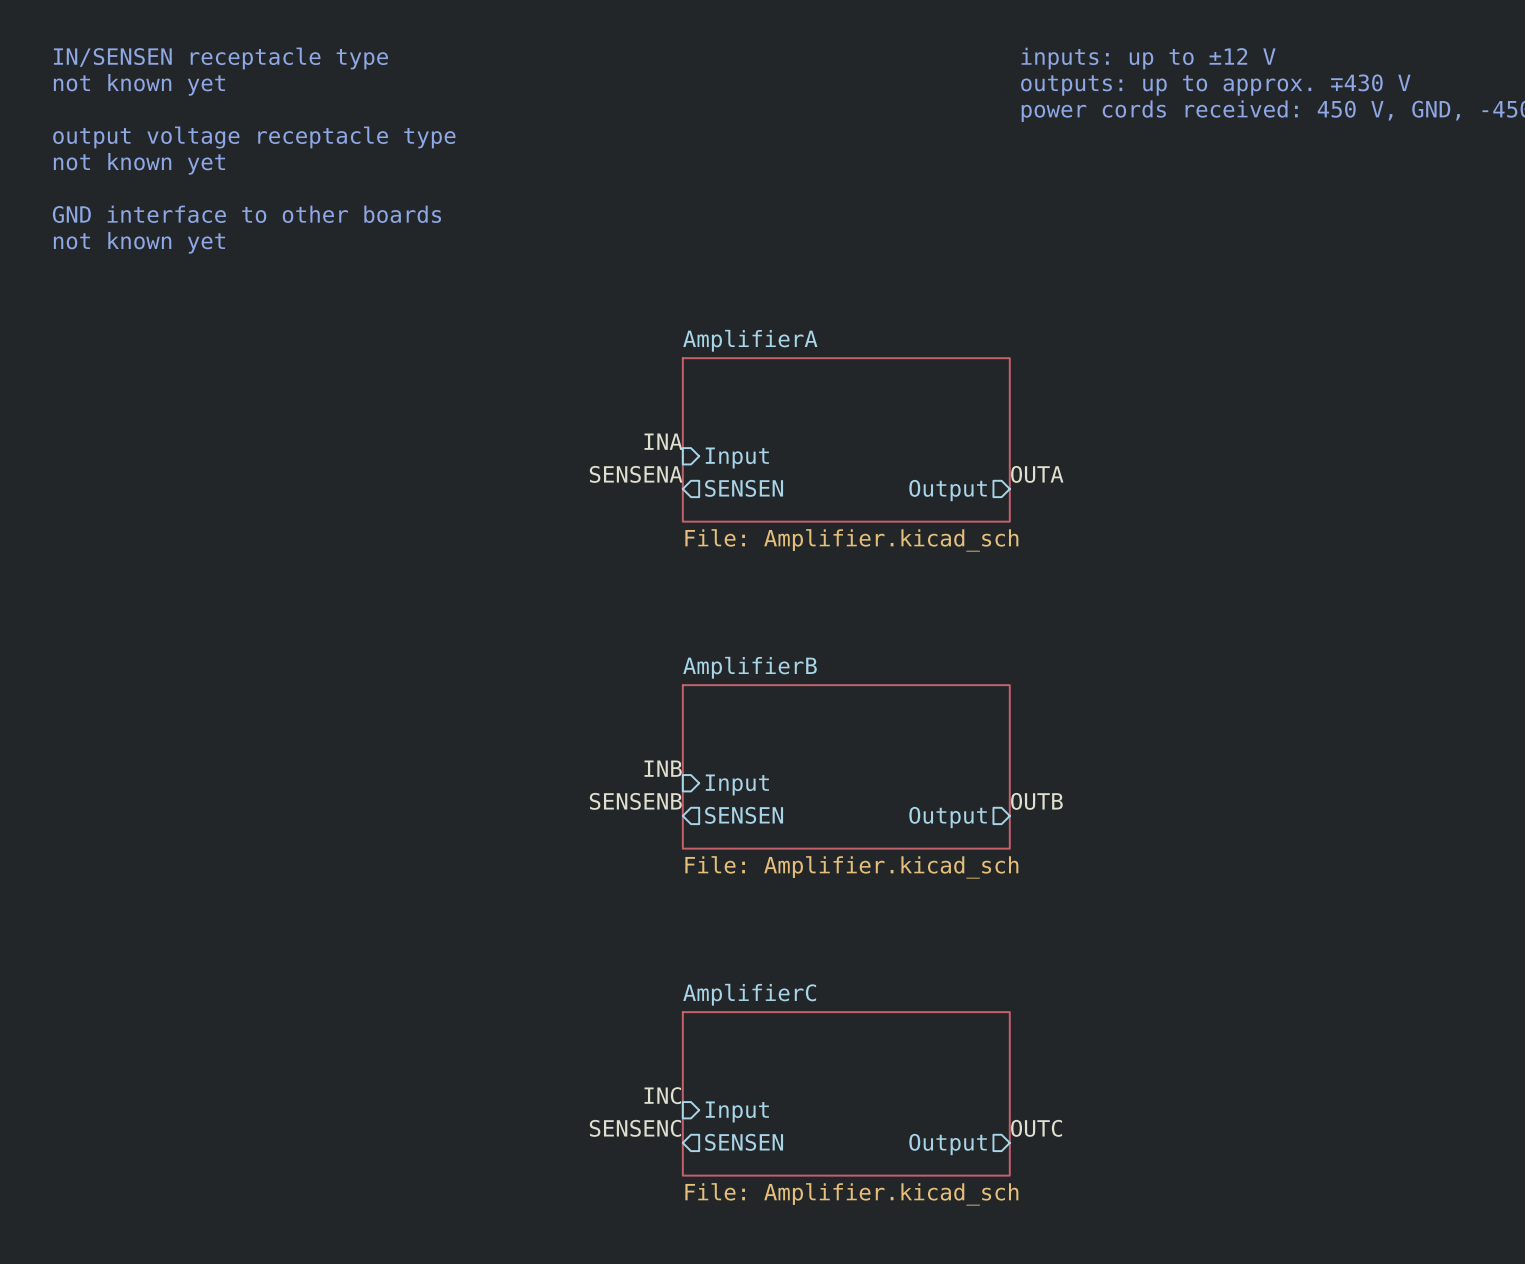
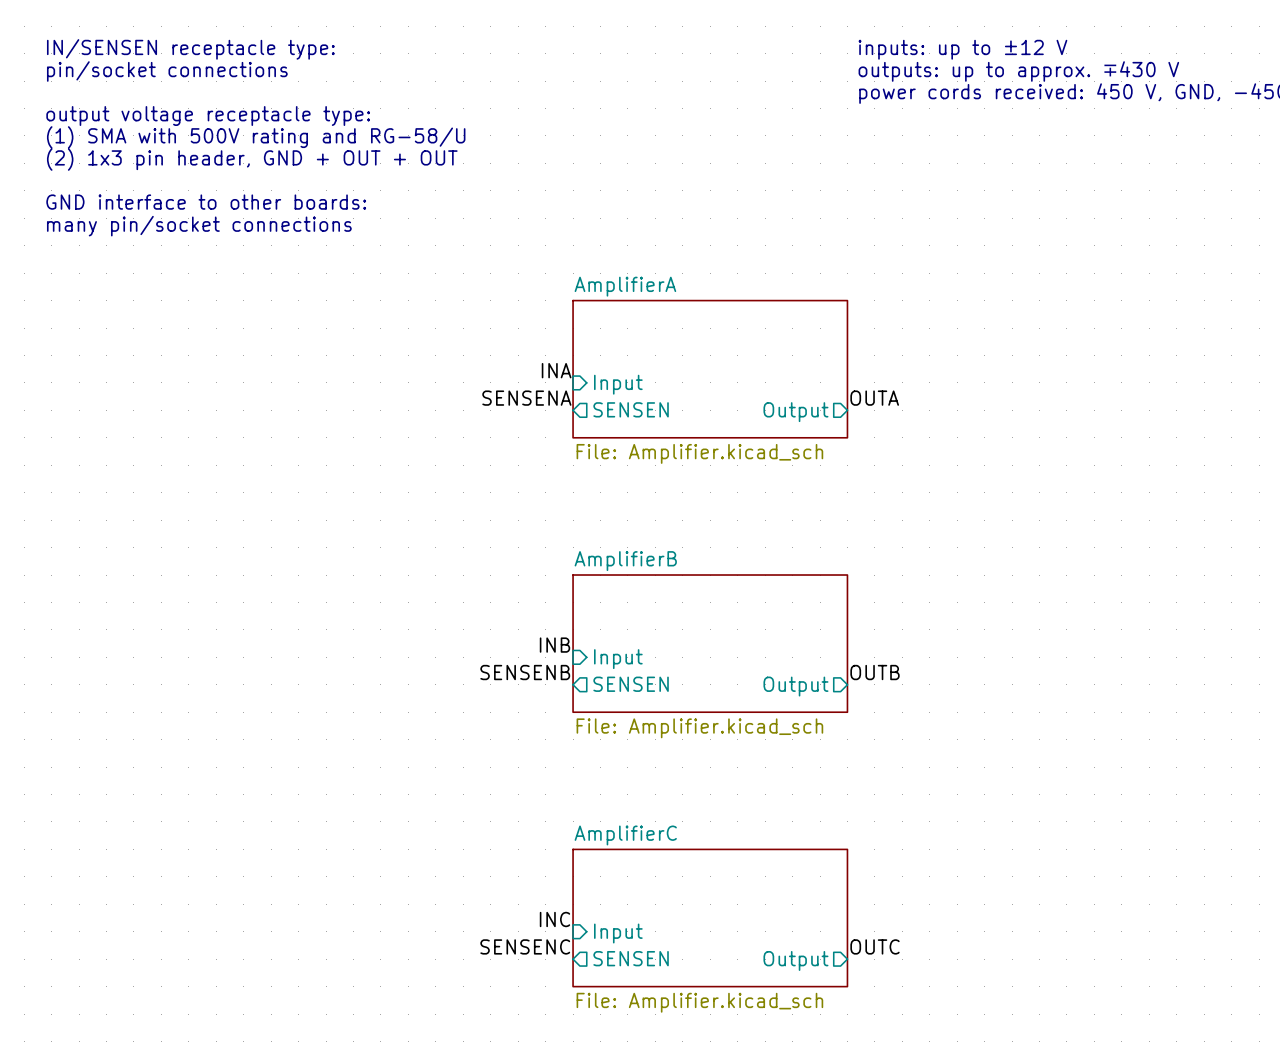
text: IN/SENSEN receptacle type (220, 58) -> IN/SENSEN receptacle type: (190, 49)
text: not known yet (139, 84) -> pin/socket connections (167, 71)
text: output voltage receptacle type (254, 137) -> output voltage receptacle type: (208, 116)
text: not known yet (139, 163) -> (1) SMA with 500V rating and RG-58/U (256, 137)
text: none -> (2) 1x3 pin header, GND + OUT + OUT (252, 159)
text: GND interface to other boards (246, 214) -> none
text: not known yet (139, 242) -> GND interface to other boards: (206, 202)
text: none -> many pin/socket connections (199, 226)

